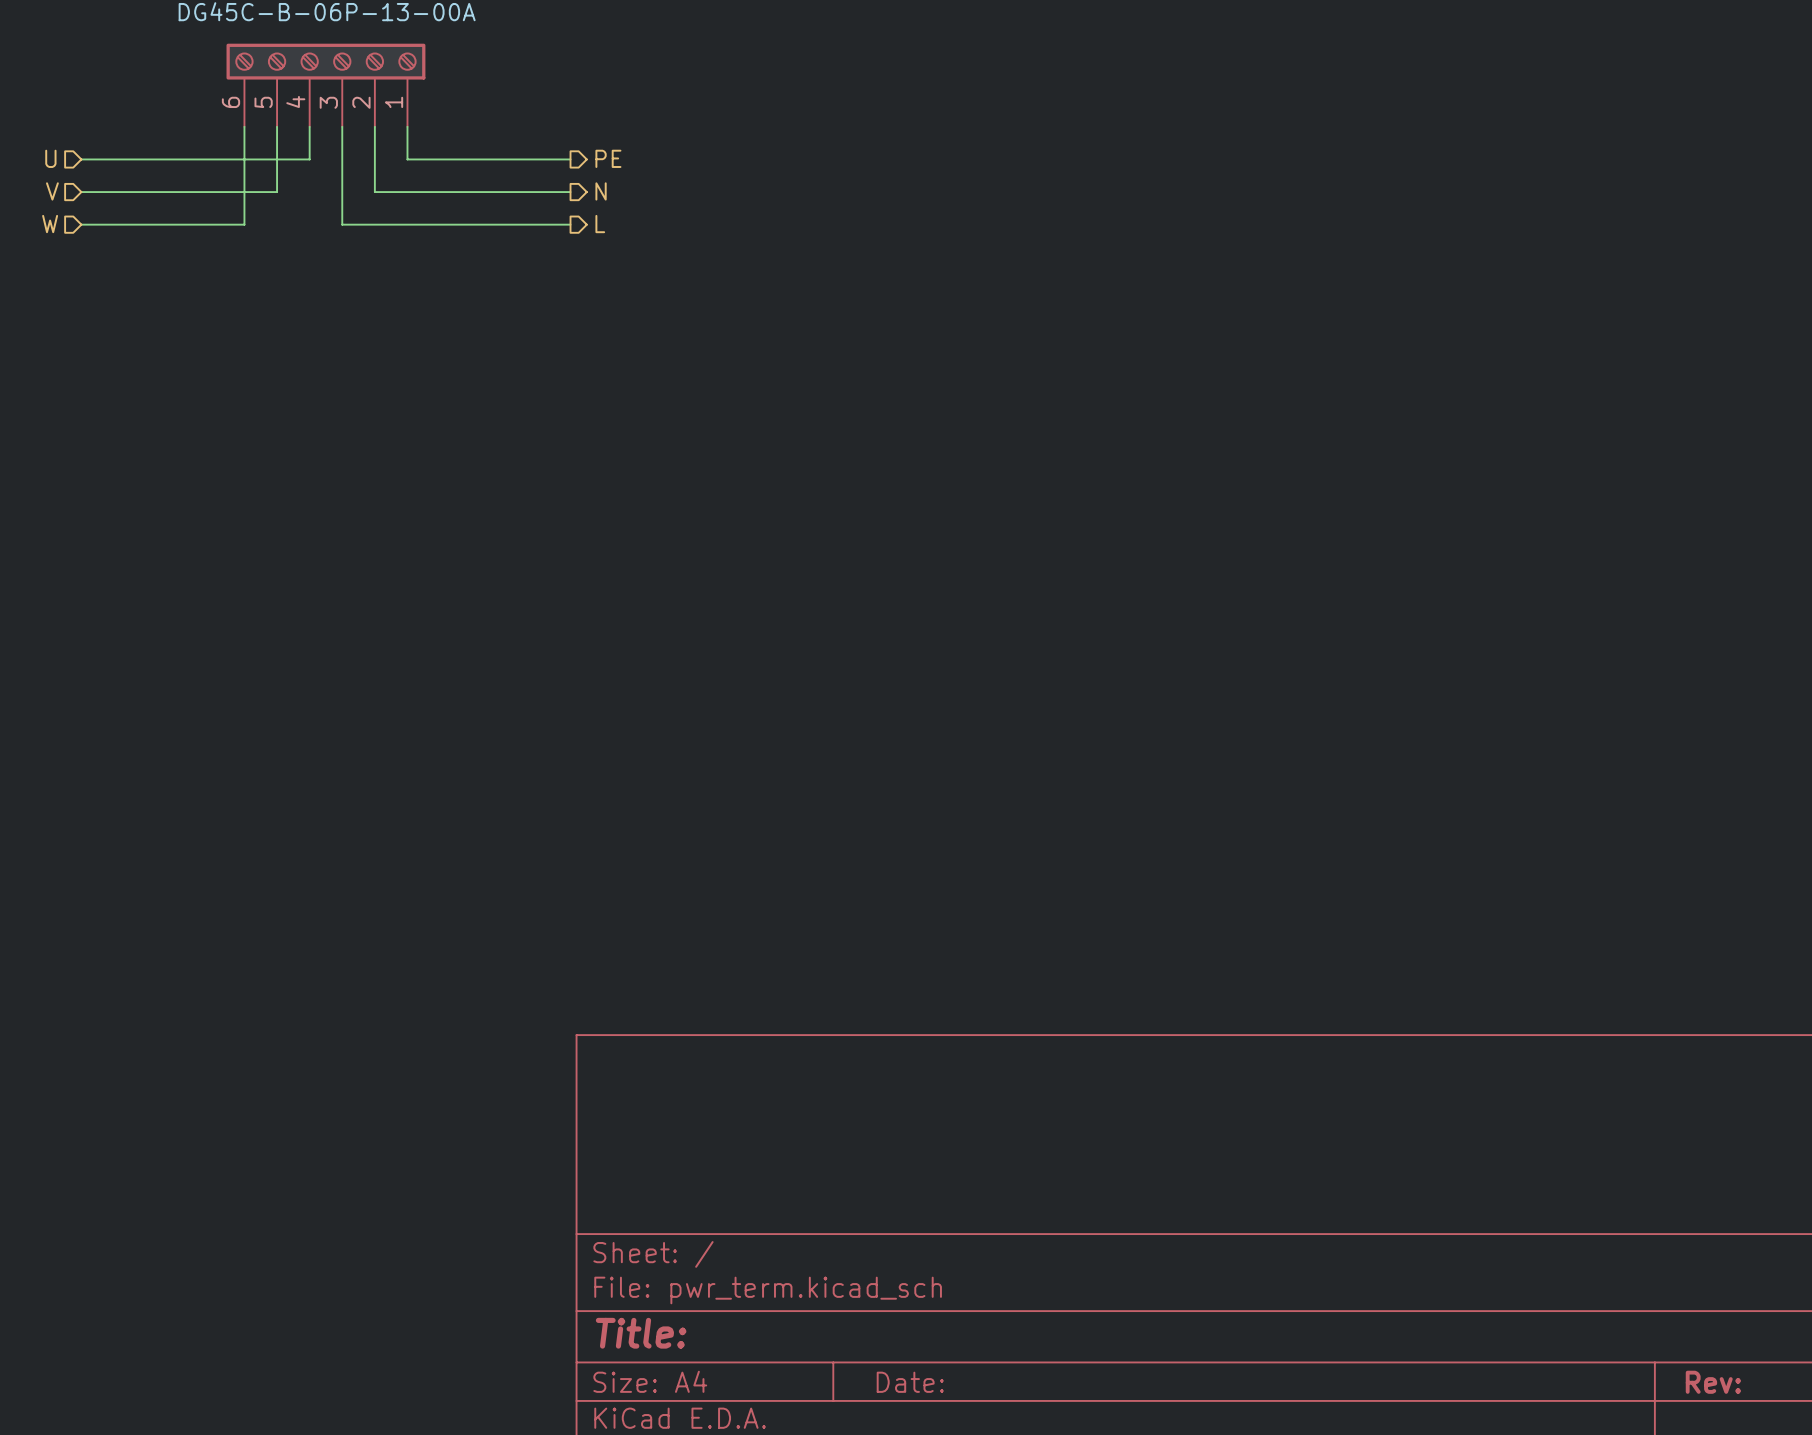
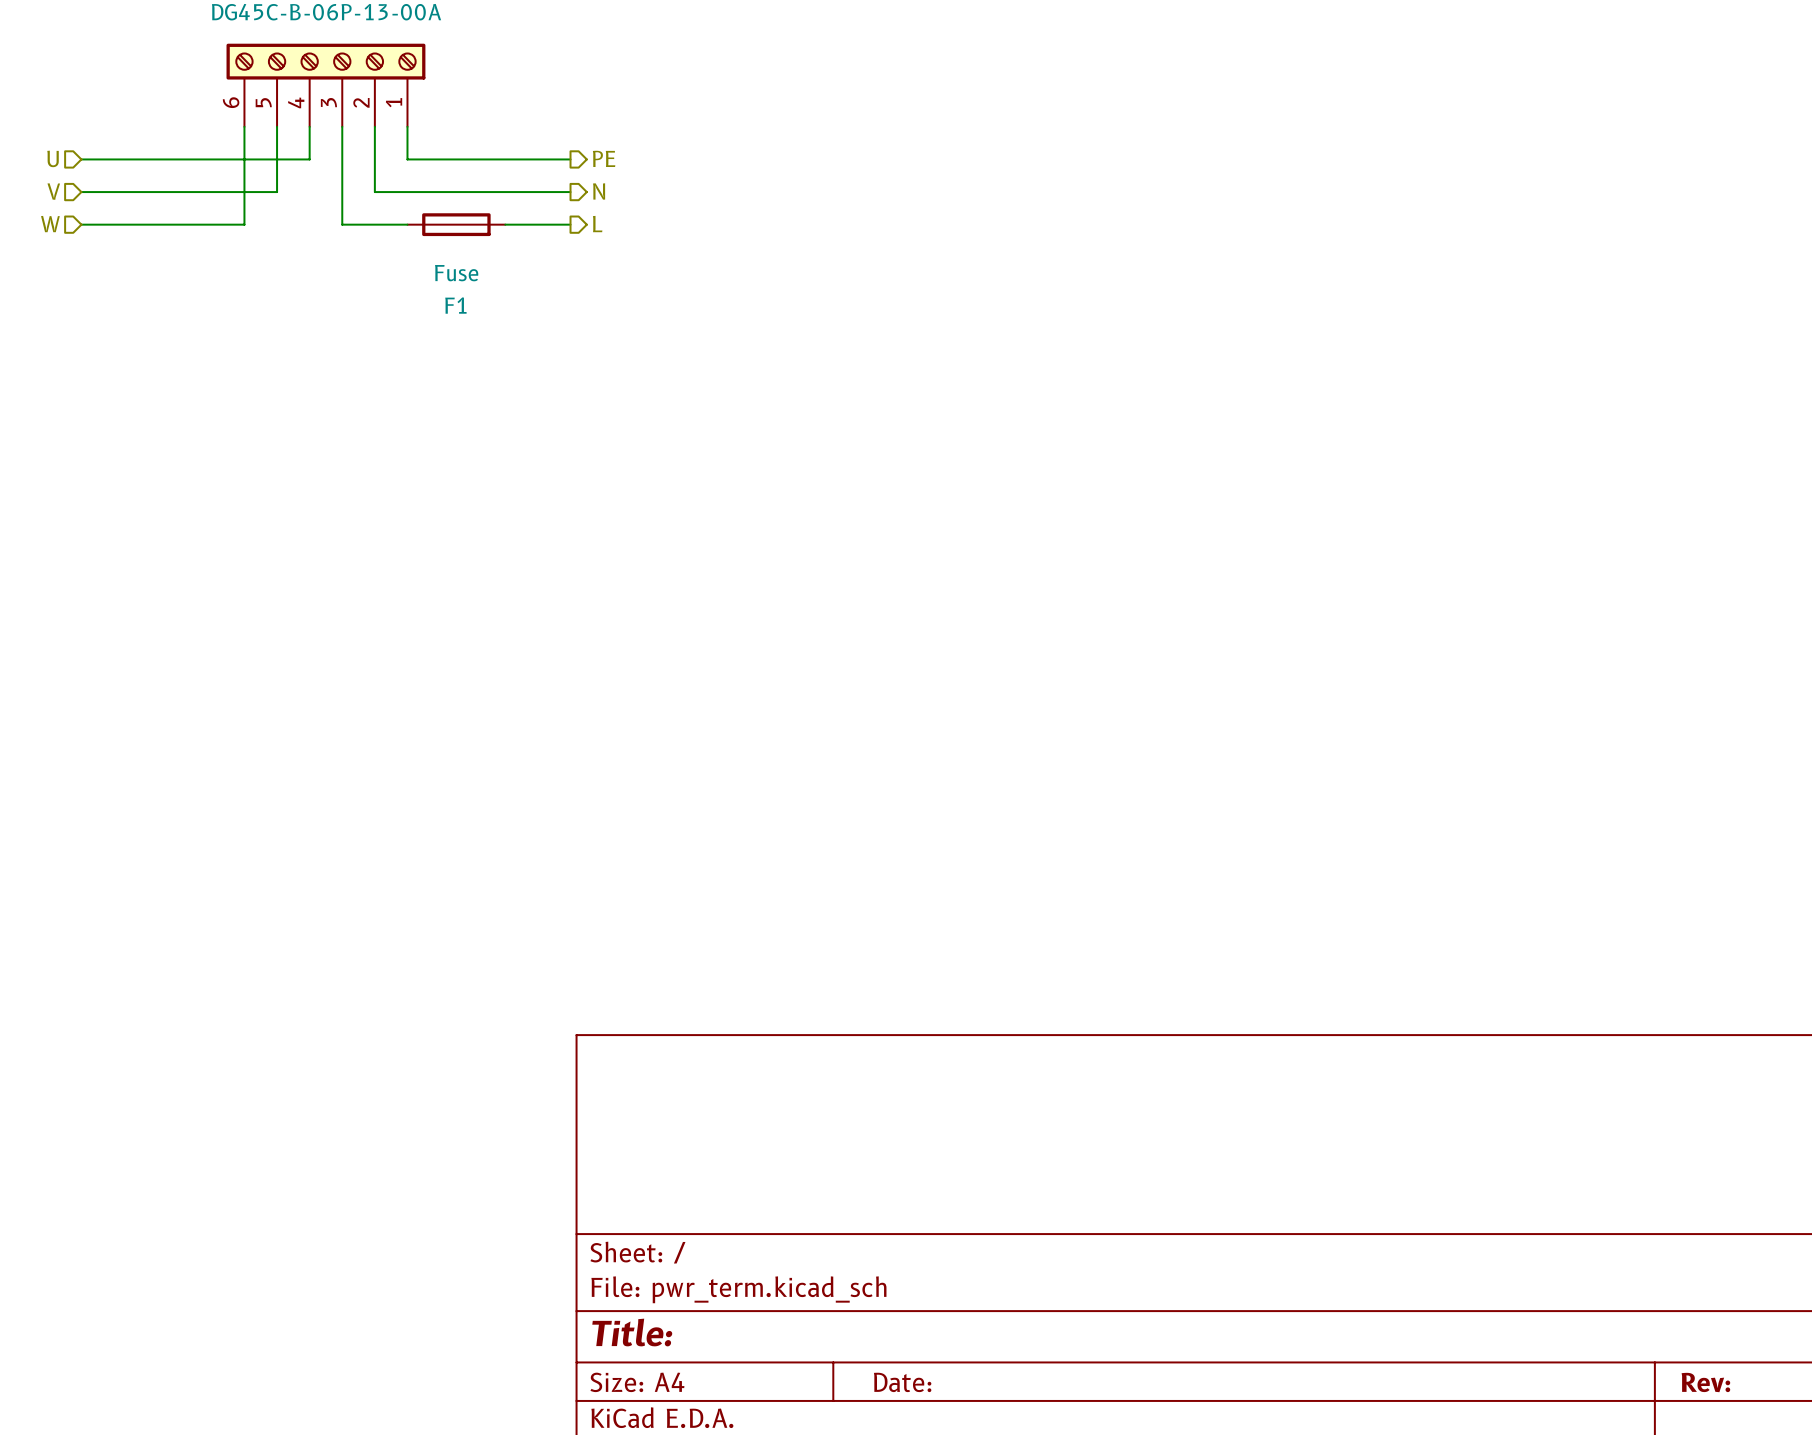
F1: none -> Fuse (456, 224)

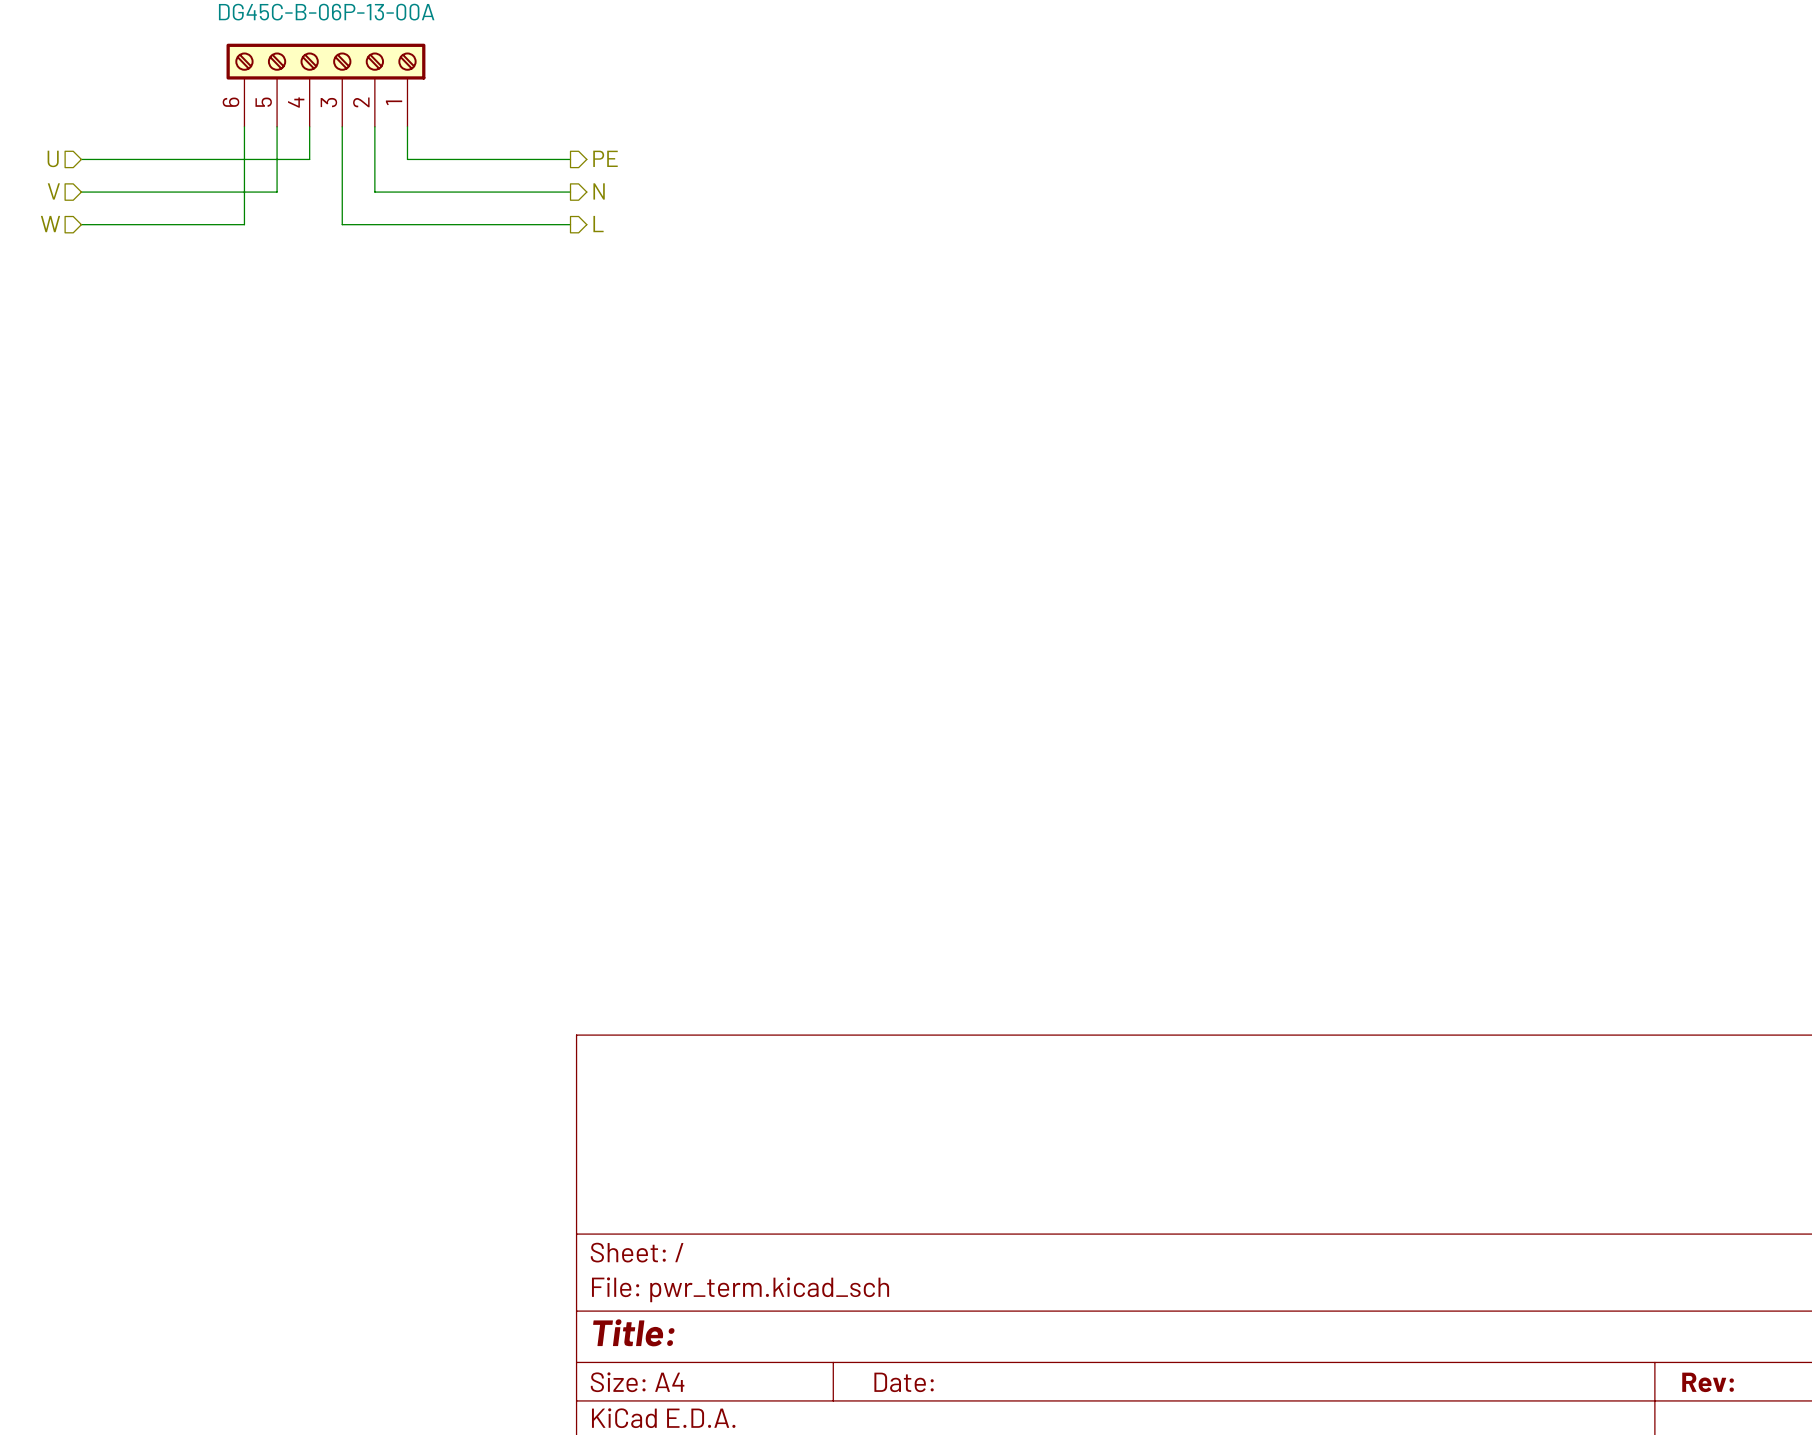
F1: Fuse (456, 224) -> none

